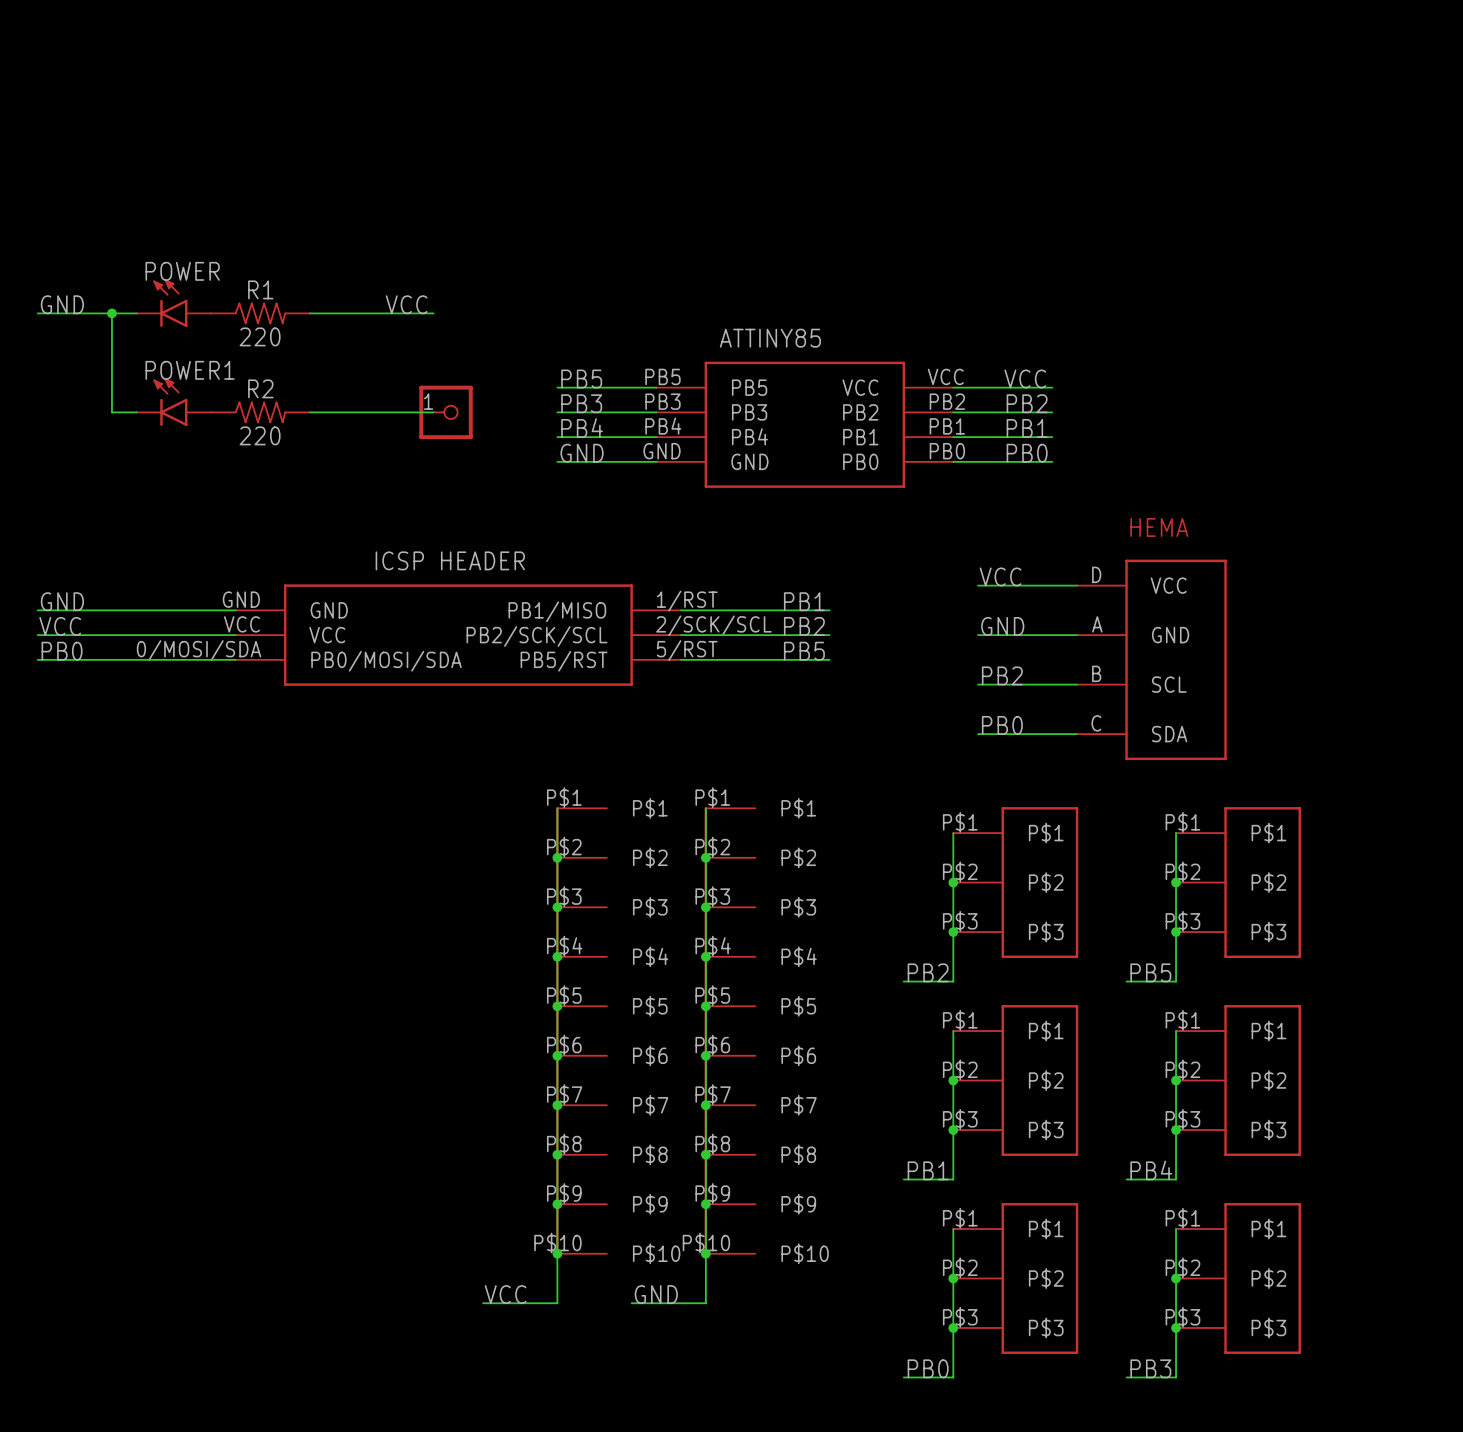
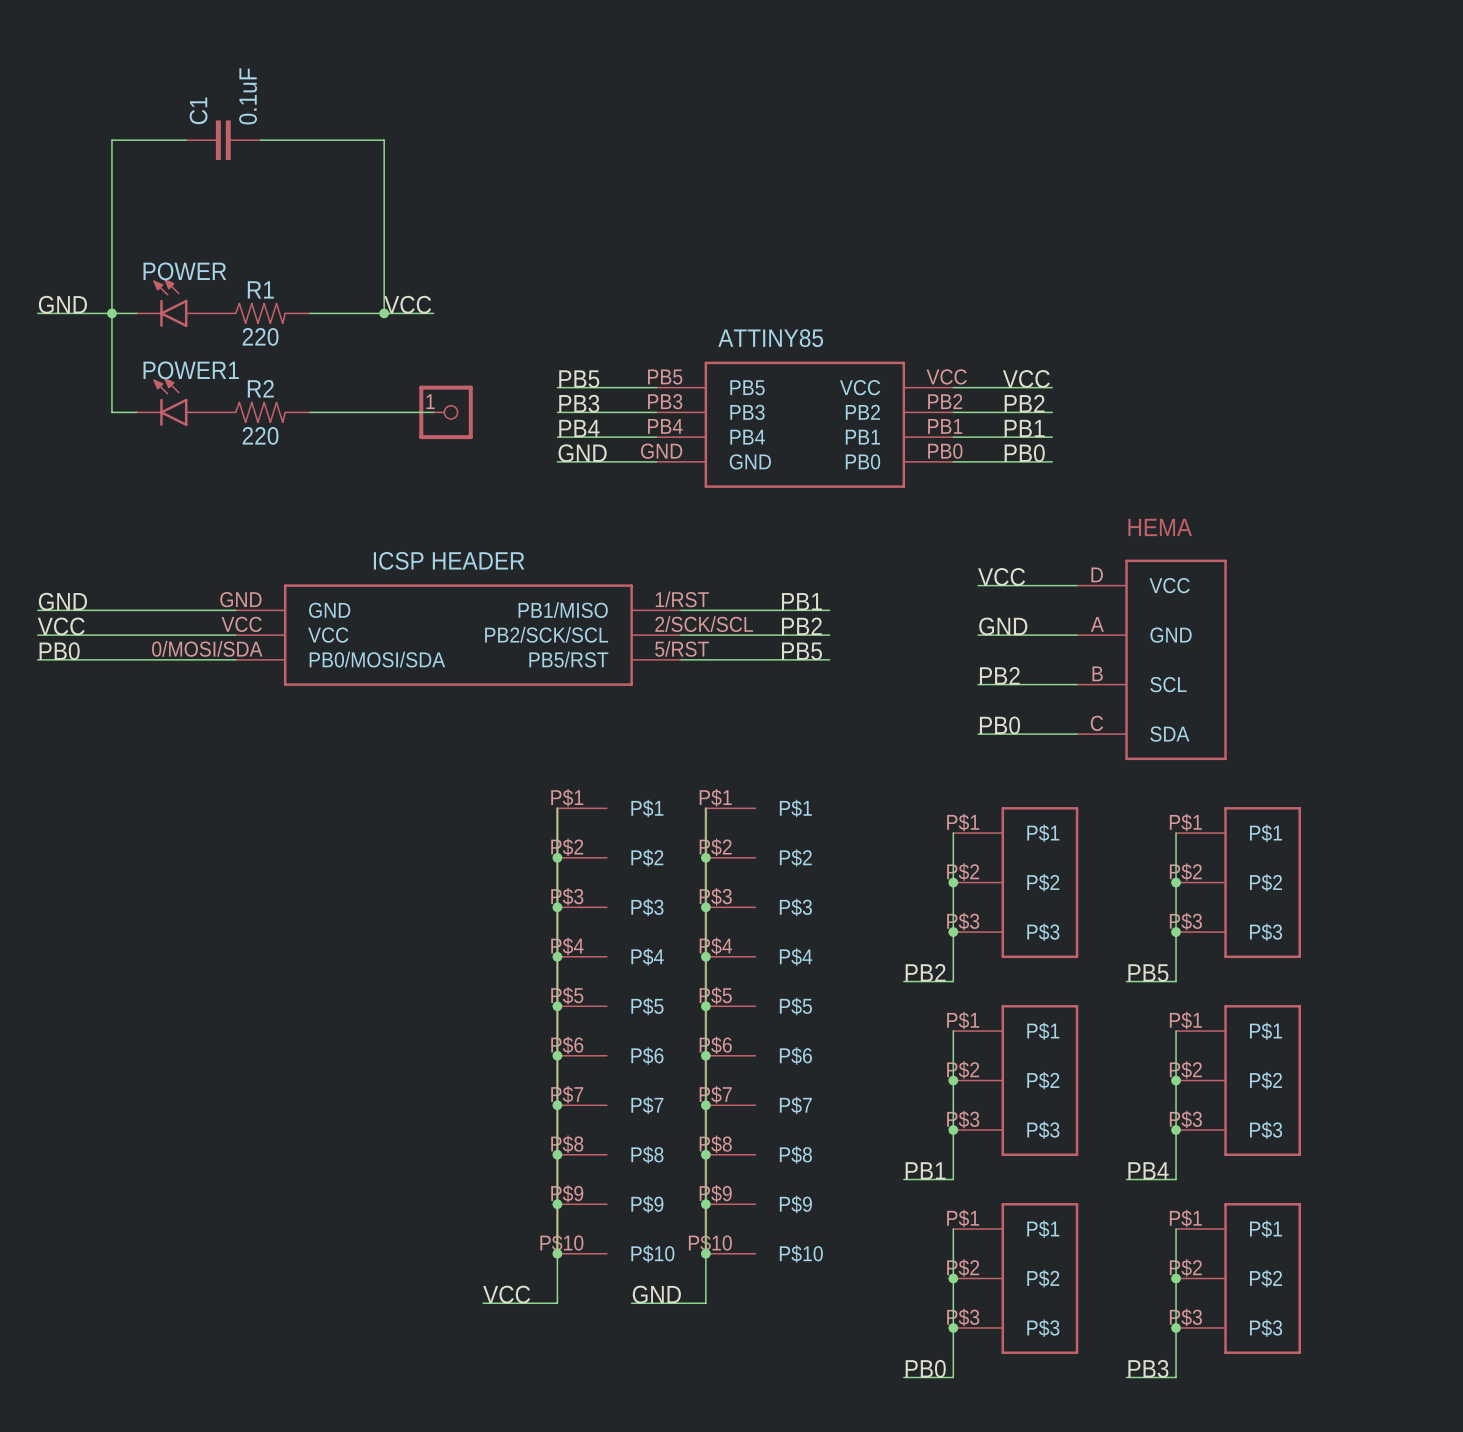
wire: none -> (186, 140) (111, 140) (111, 313)
C1: none -> 0.1uF (223, 140)
wire: none -> (260, 140) (384, 140) (384, 313)
junction: none -> (384, 313)

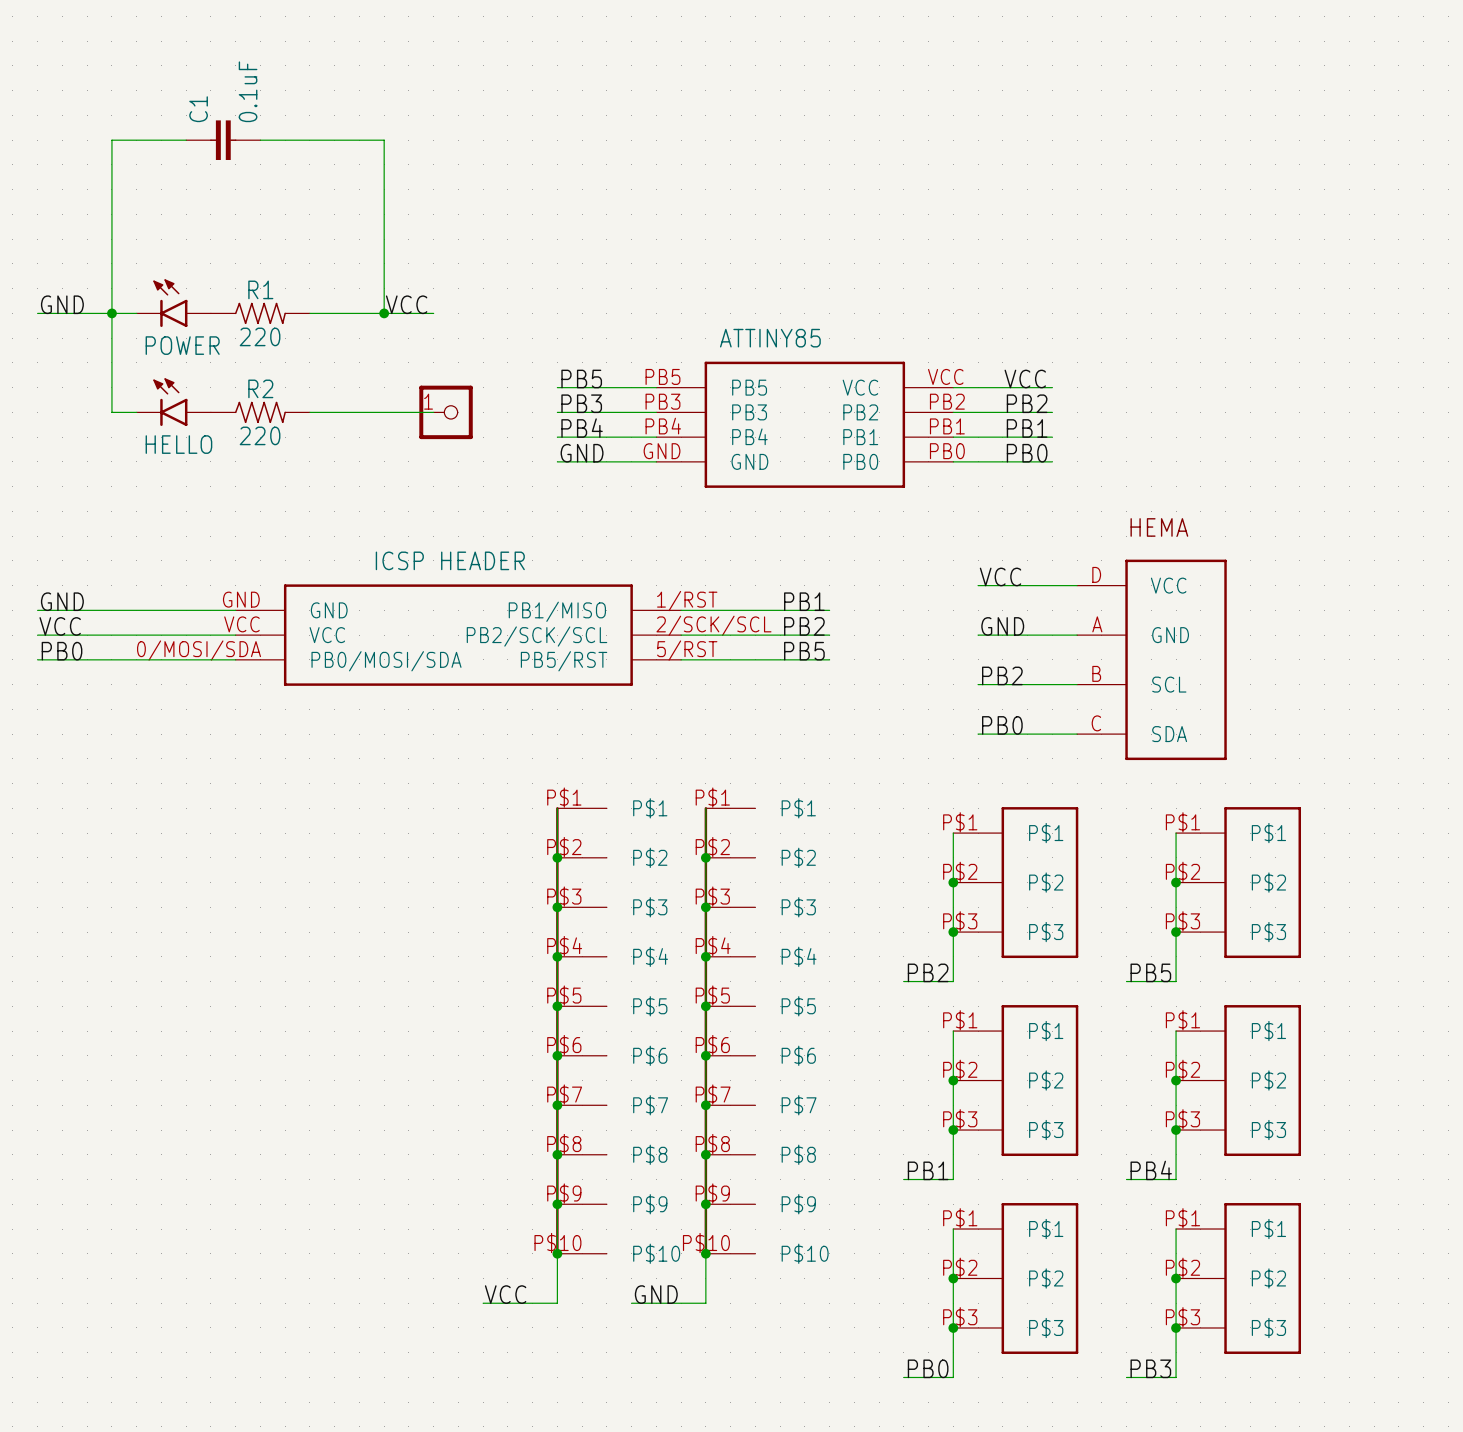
POWER name position: POWER (184, 271) -> POWER (182, 345)
POWER1 name: POWER1 (191, 370) -> HELLO (178, 444)

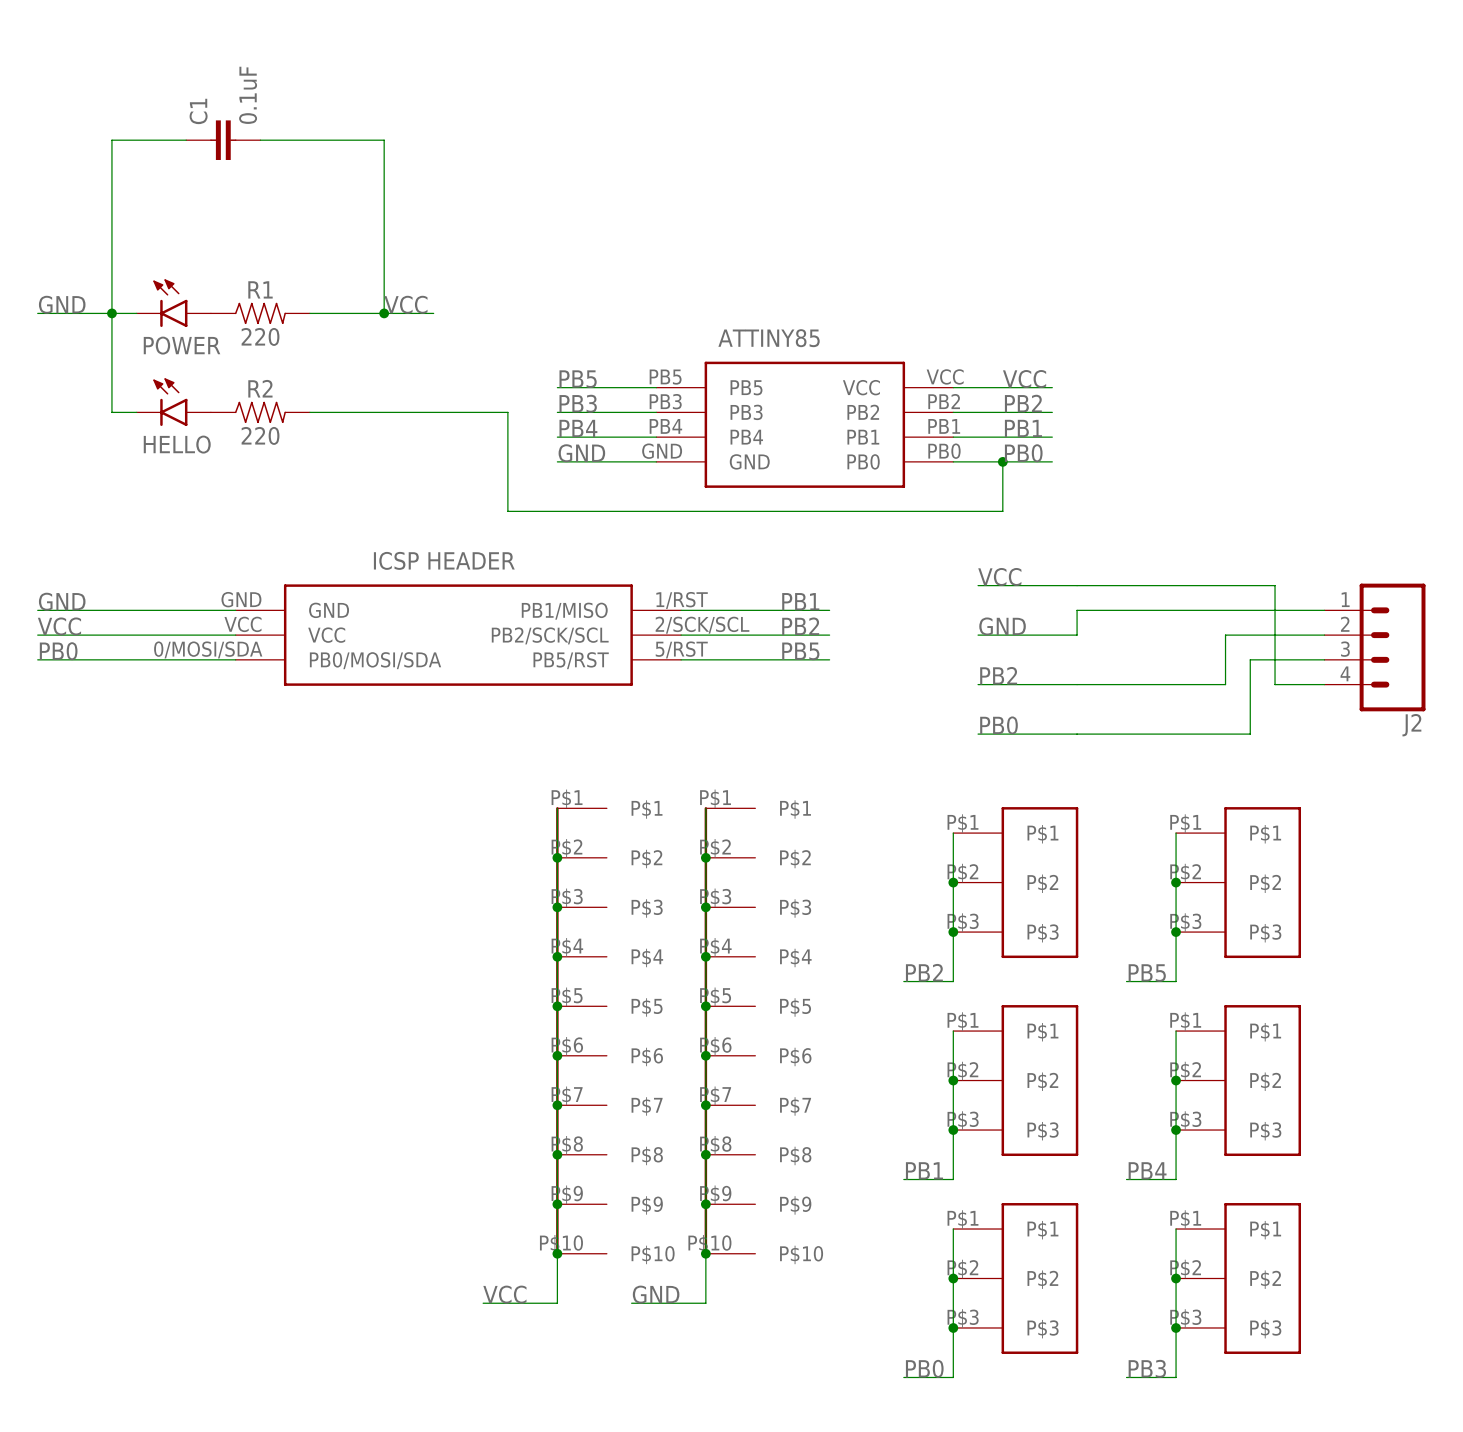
wire: none -> (433, 412) (507, 412) (507, 511) (1002, 511) (1002, 461)
part: (446, 412) -> none
junction: none -> (1002, 461)
wire: none -> (1077, 585) (1275, 585) (1275, 684) (1324, 684)
wire: none -> (1324, 610) (1077, 610) (1077, 635)
wire: none -> (1324, 635) (1225, 635) (1225, 684) (1077, 684)
J2: none -> (1374, 647)
part: (1151, 659) -> none
wire: none -> (1324, 659) (1250, 659) (1250, 734) (1077, 734)

